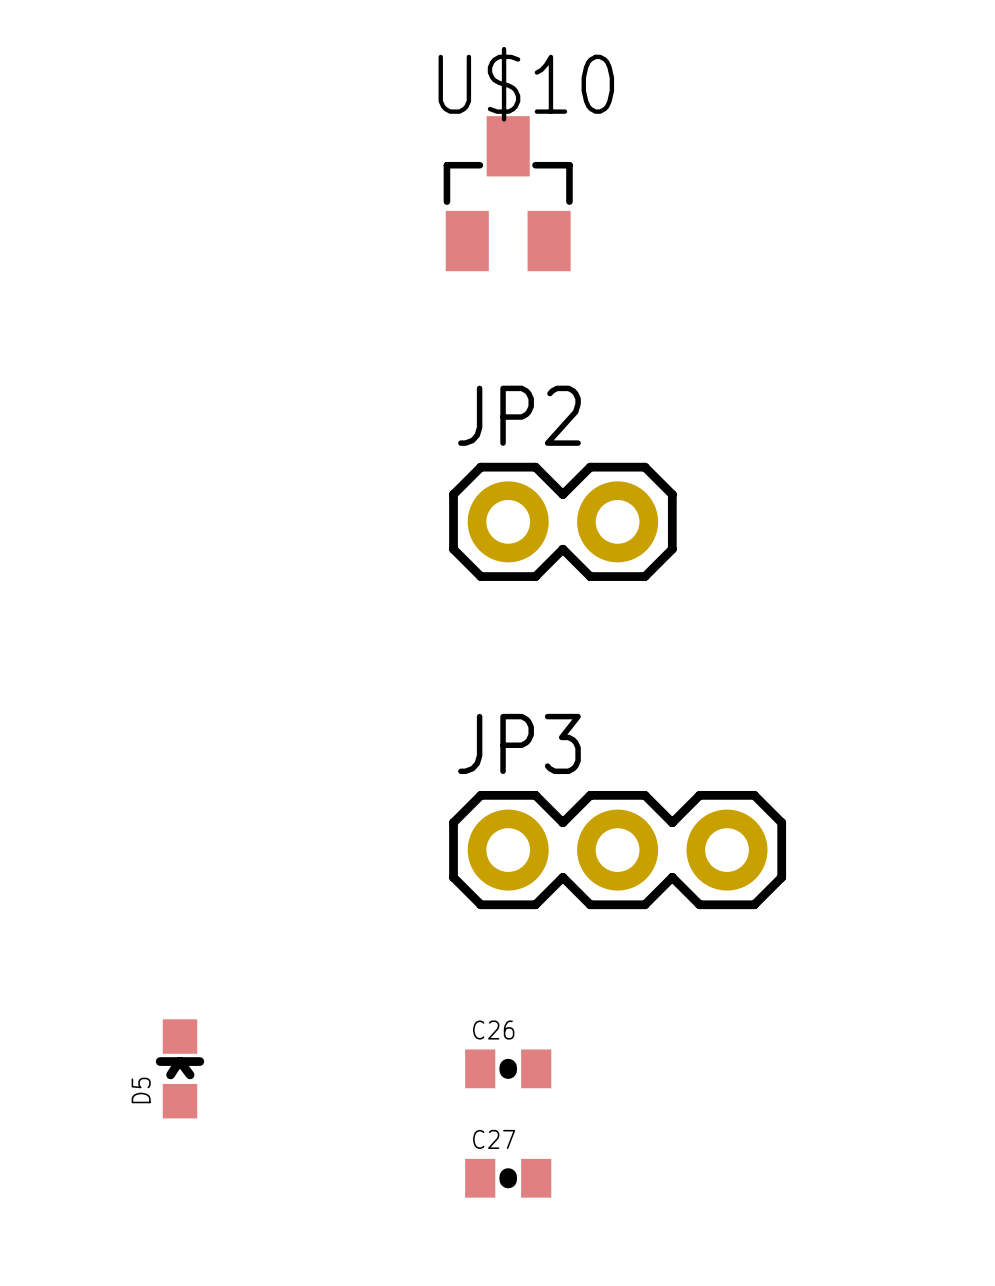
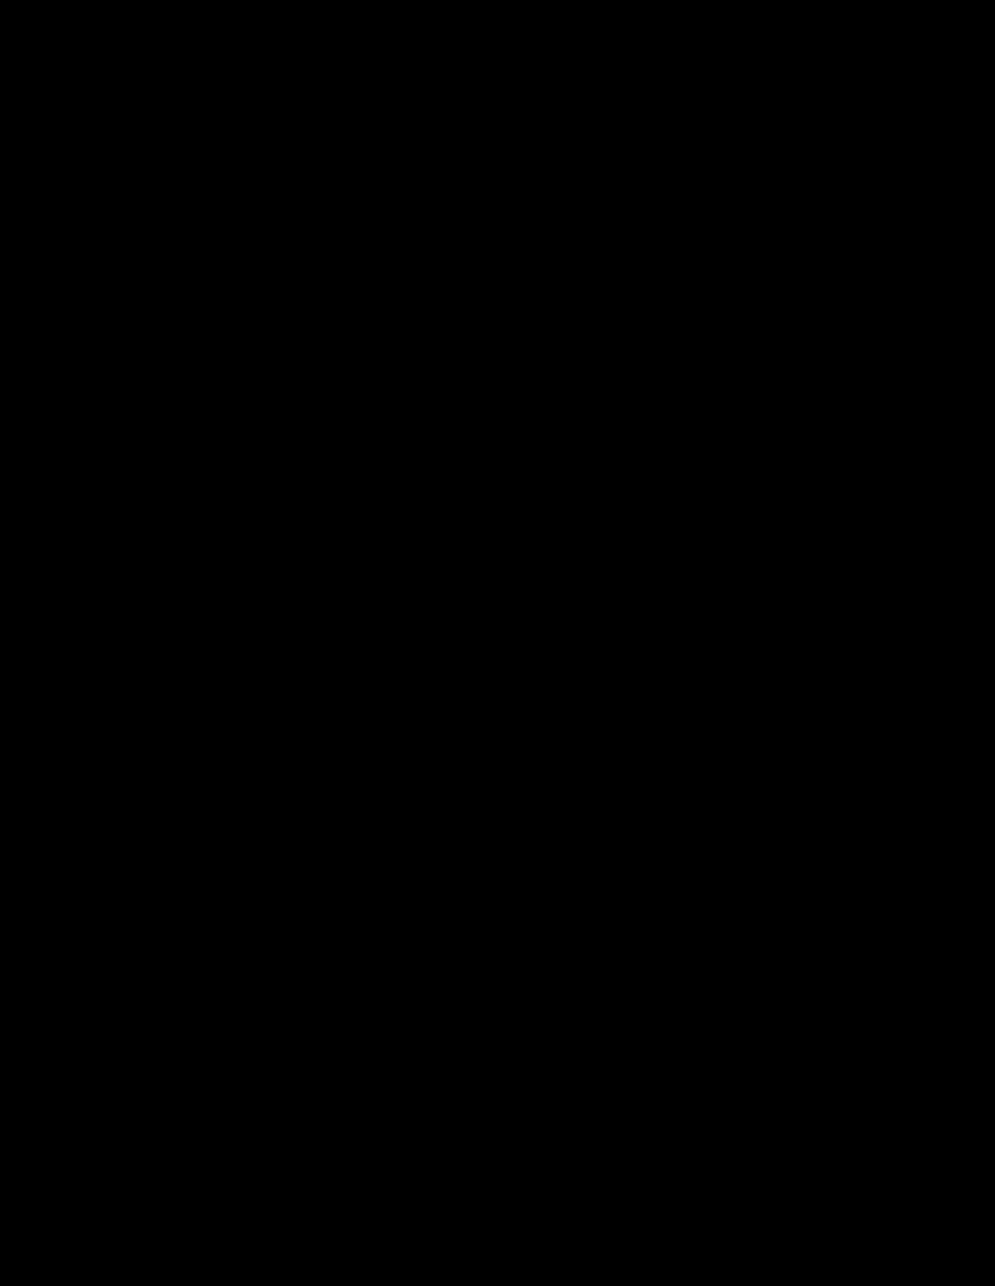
U$10: (508, 193) -> none
JP2: (562, 521) -> none
JP3: (617, 850) -> none
D5: (180, 1068) -> none
C26: (508, 1068) -> none
C27: (508, 1178) -> none

